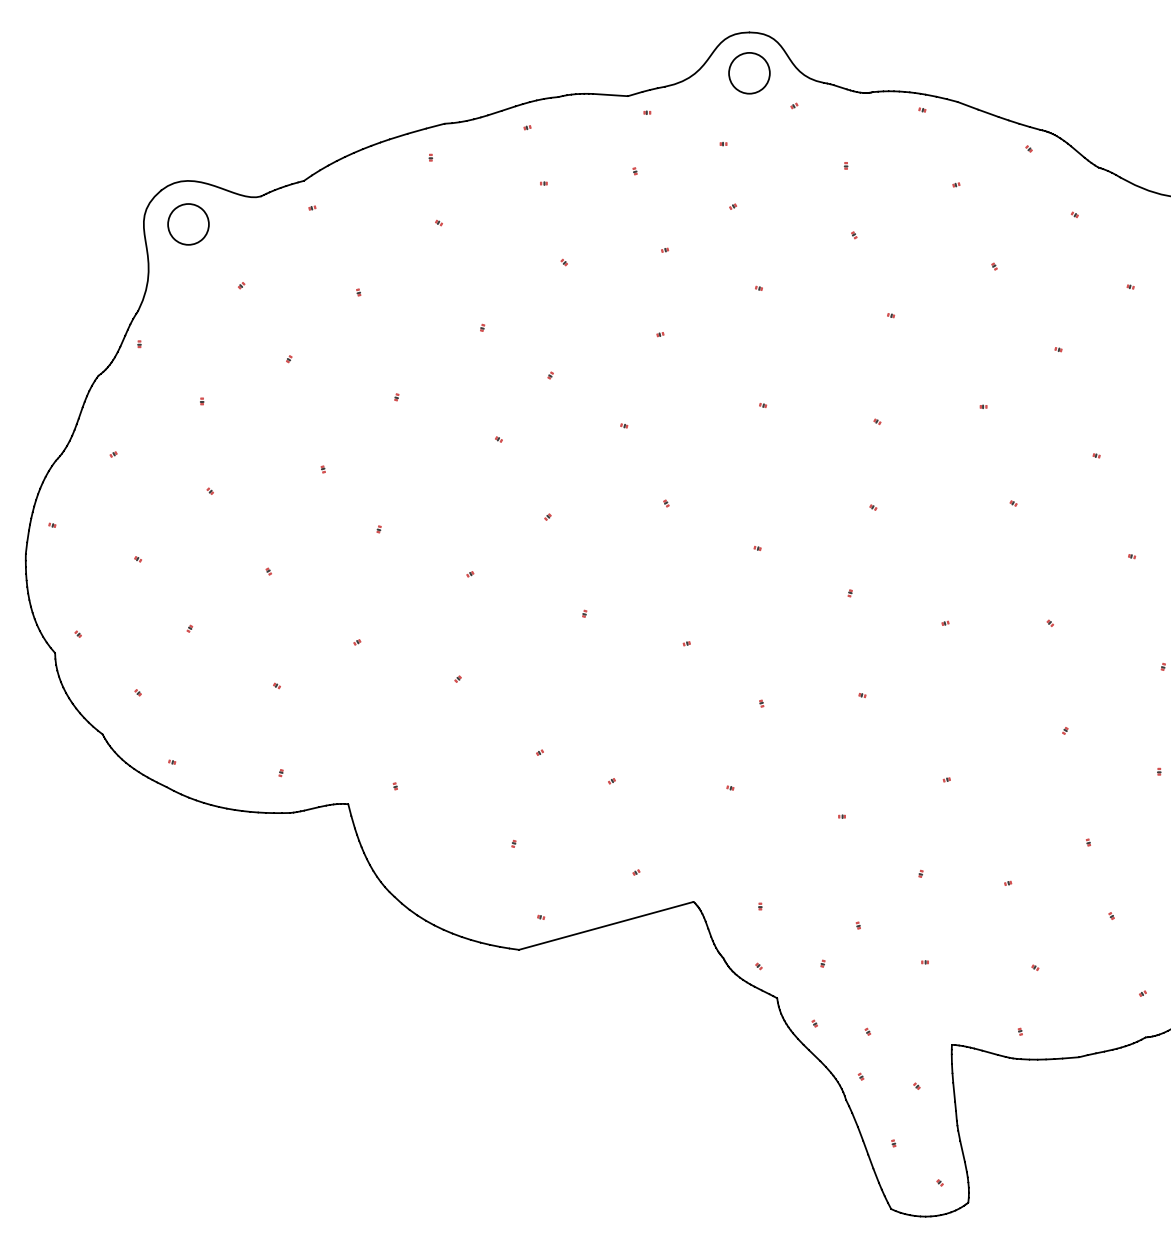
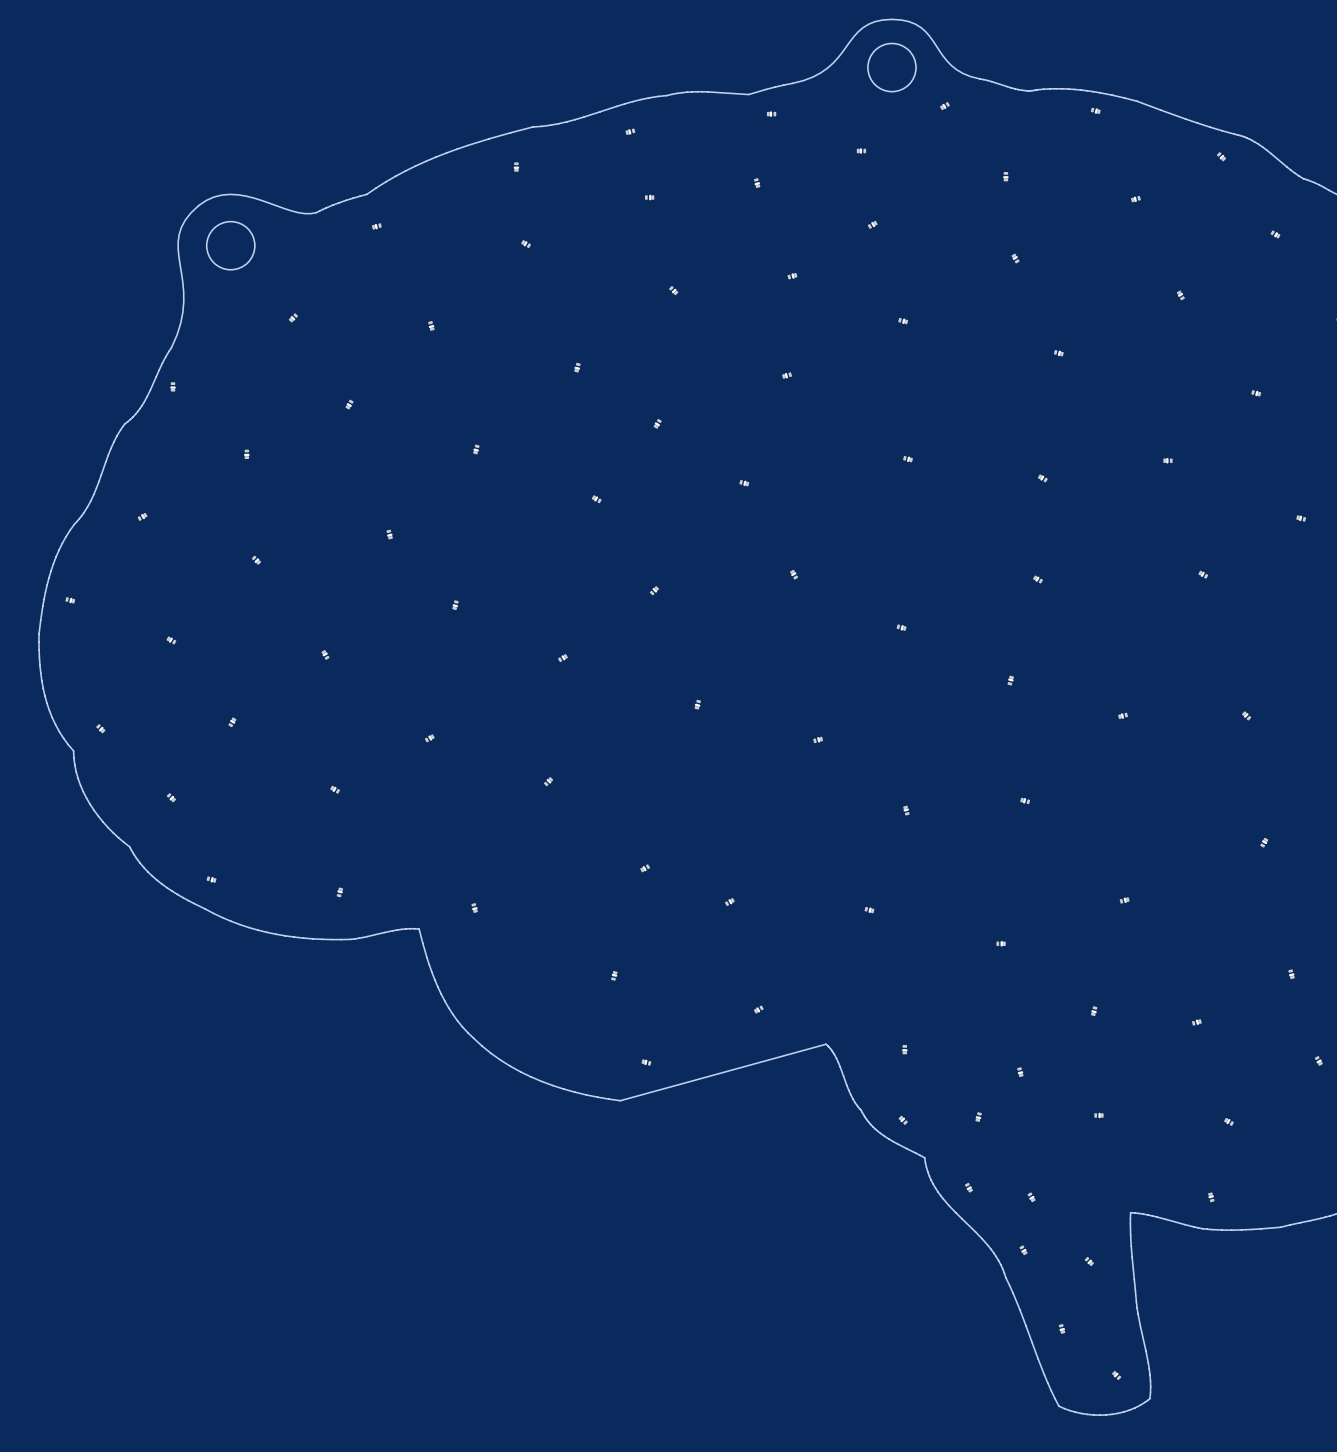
part rotation: 0° (323, 469) -> 180° (389, 534)

